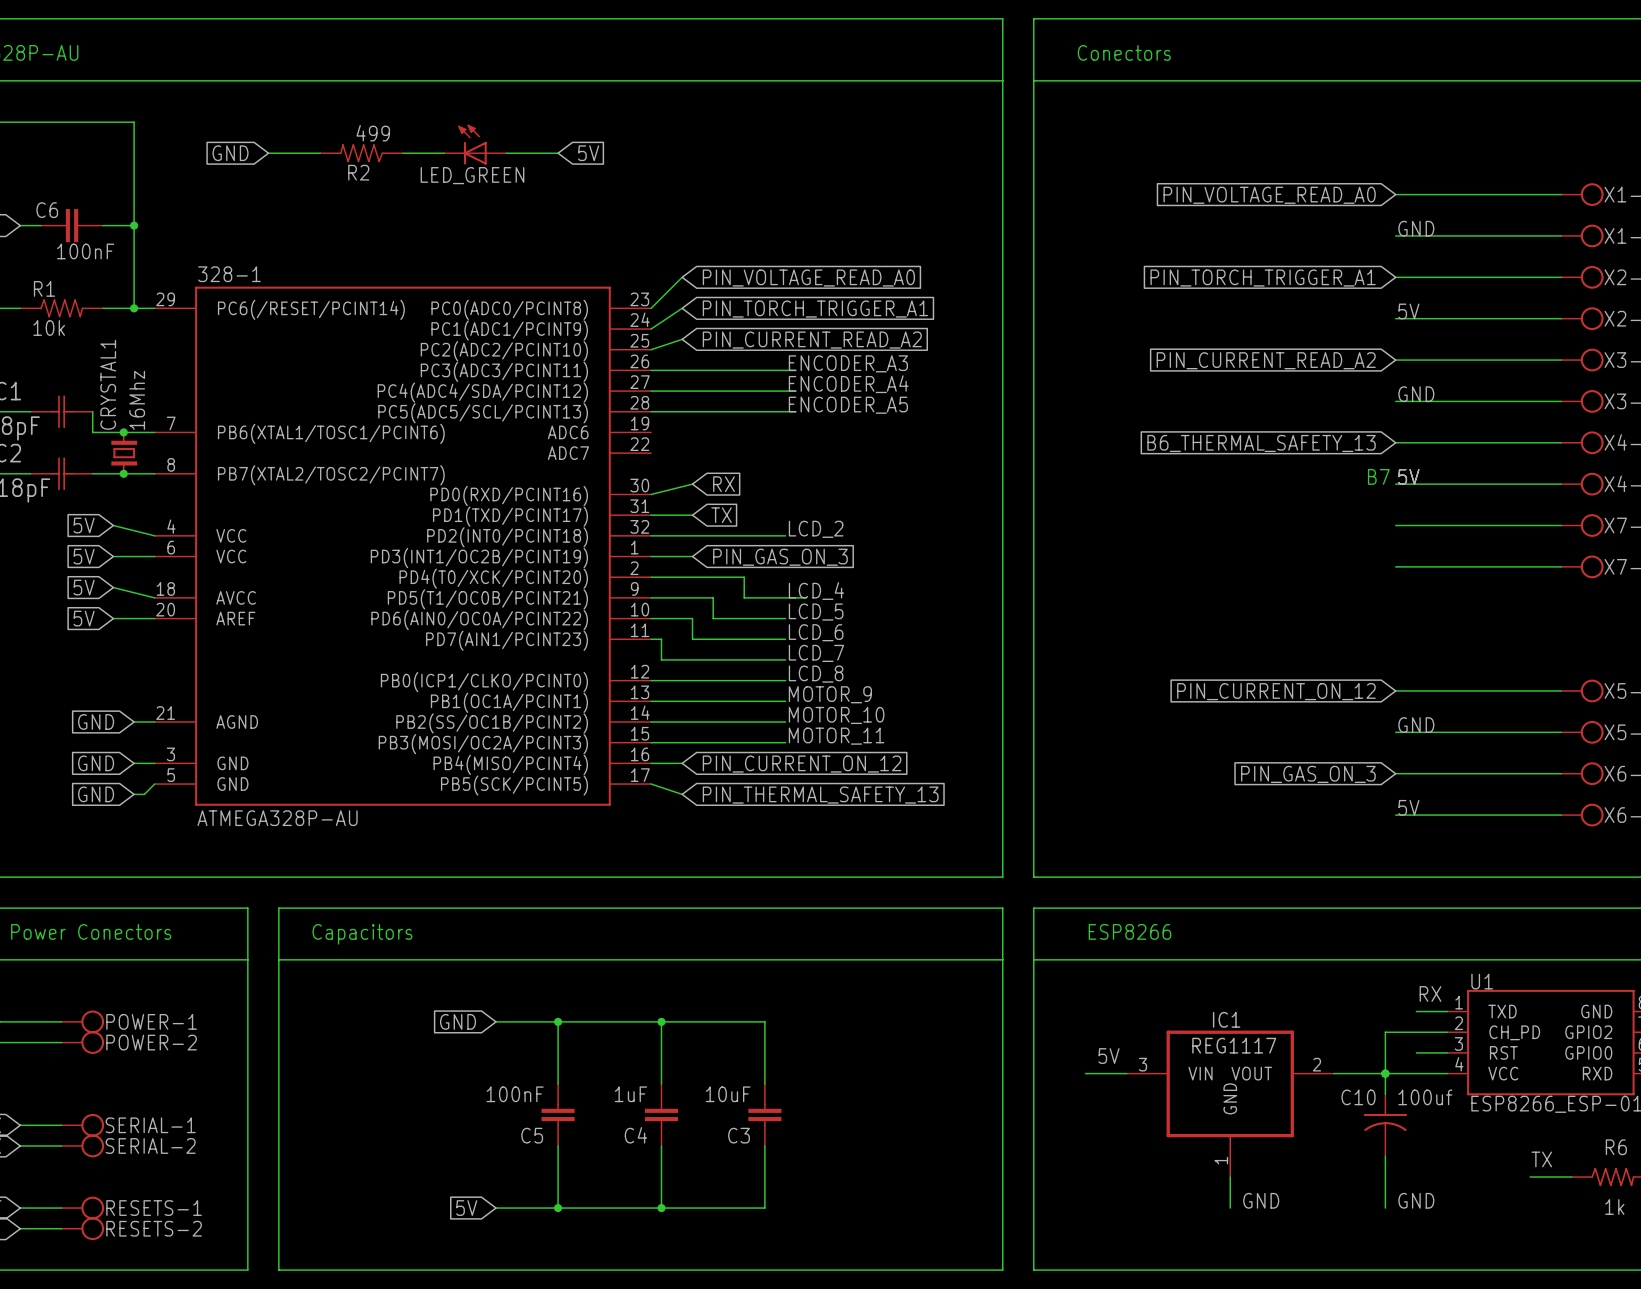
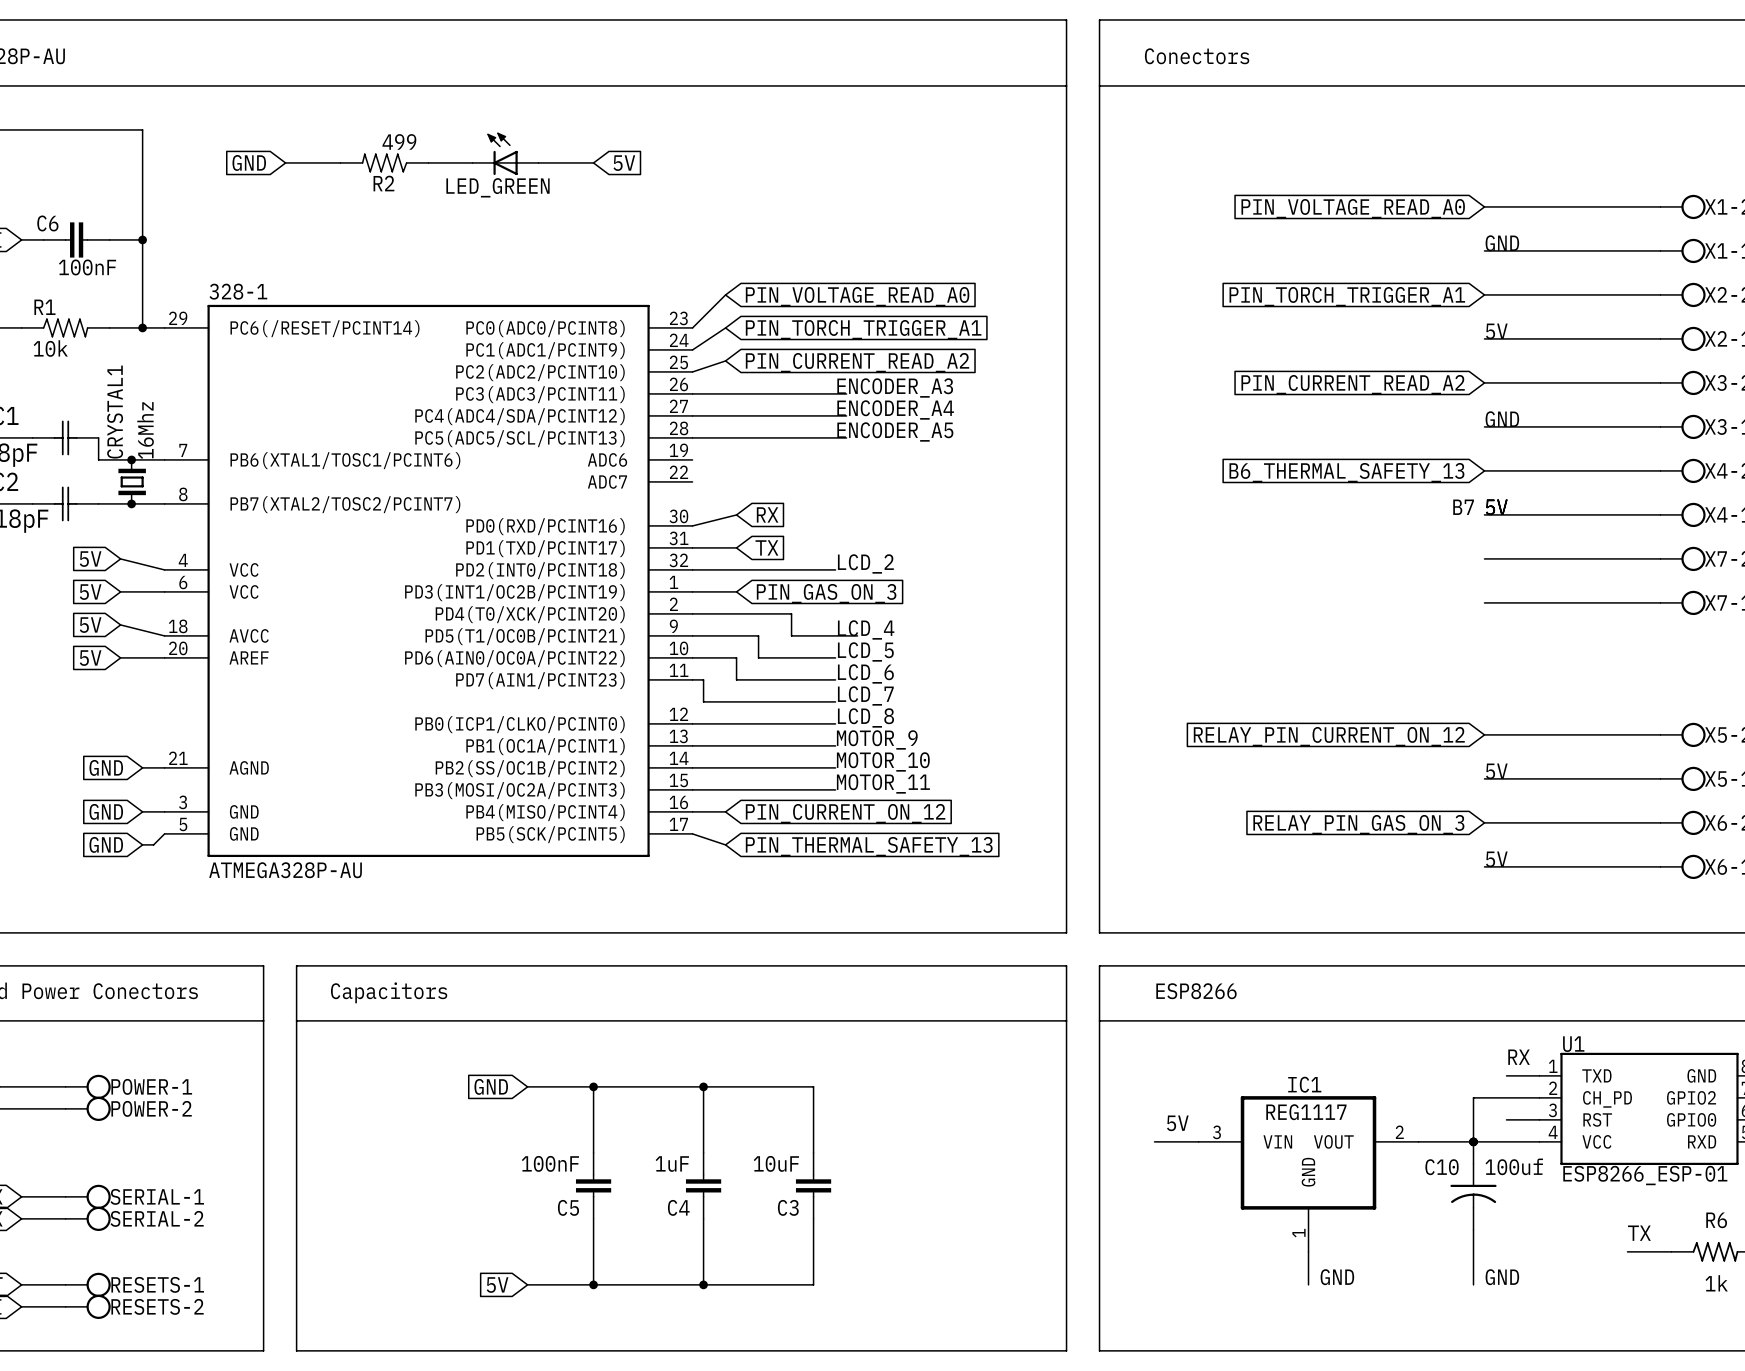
global label: PIN_CURRENT_ON_12 (1276, 691) -> RELAY_PIN_CURRENT_ON_12 (1329, 736)
label: GND (1416, 725) -> 5V (1496, 771)
global label: PIN_GAS_ON_3 (1308, 774) -> RELAY_PIN_GAS_ON_3 (1358, 824)

